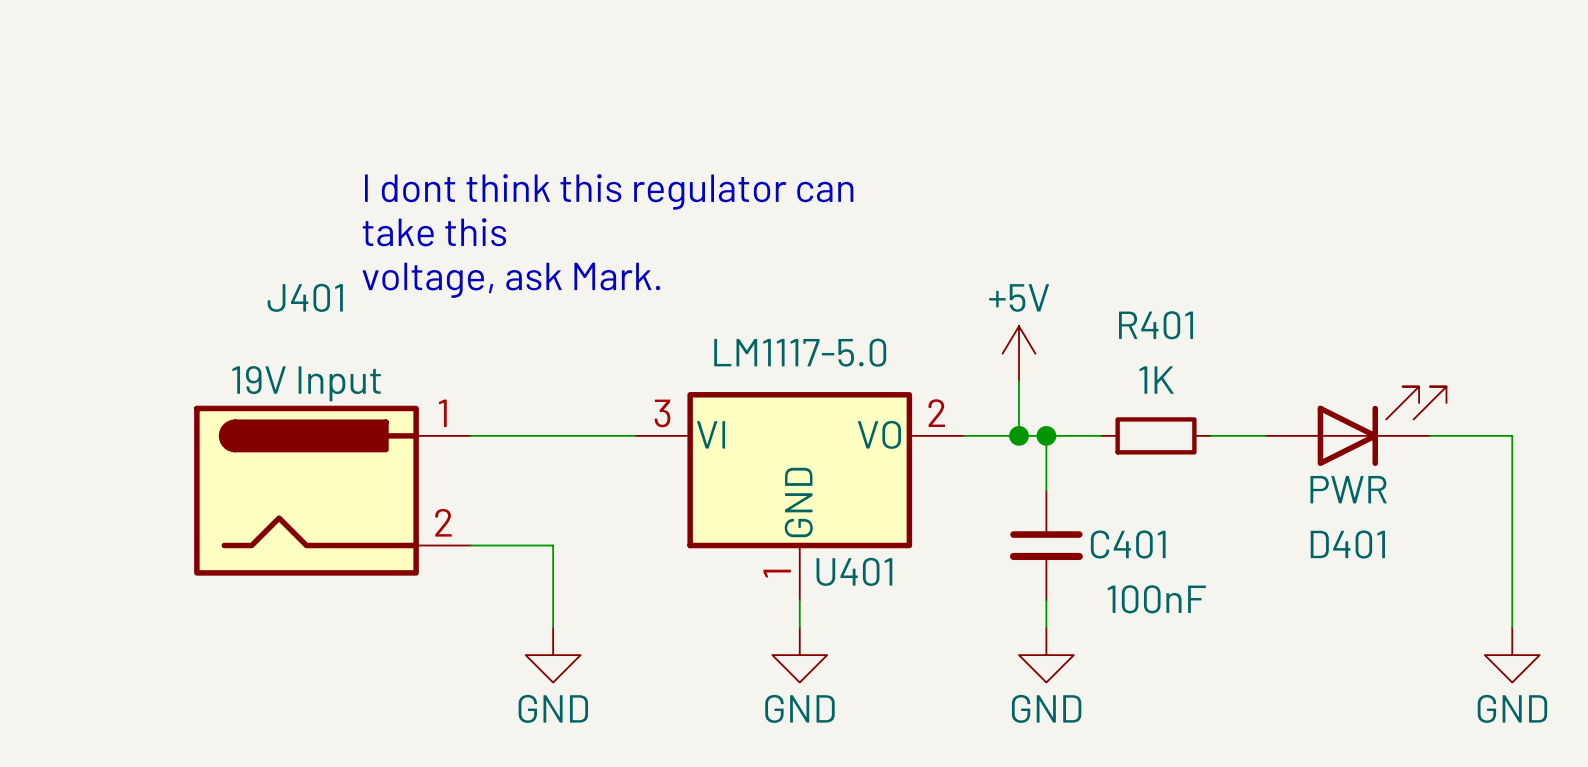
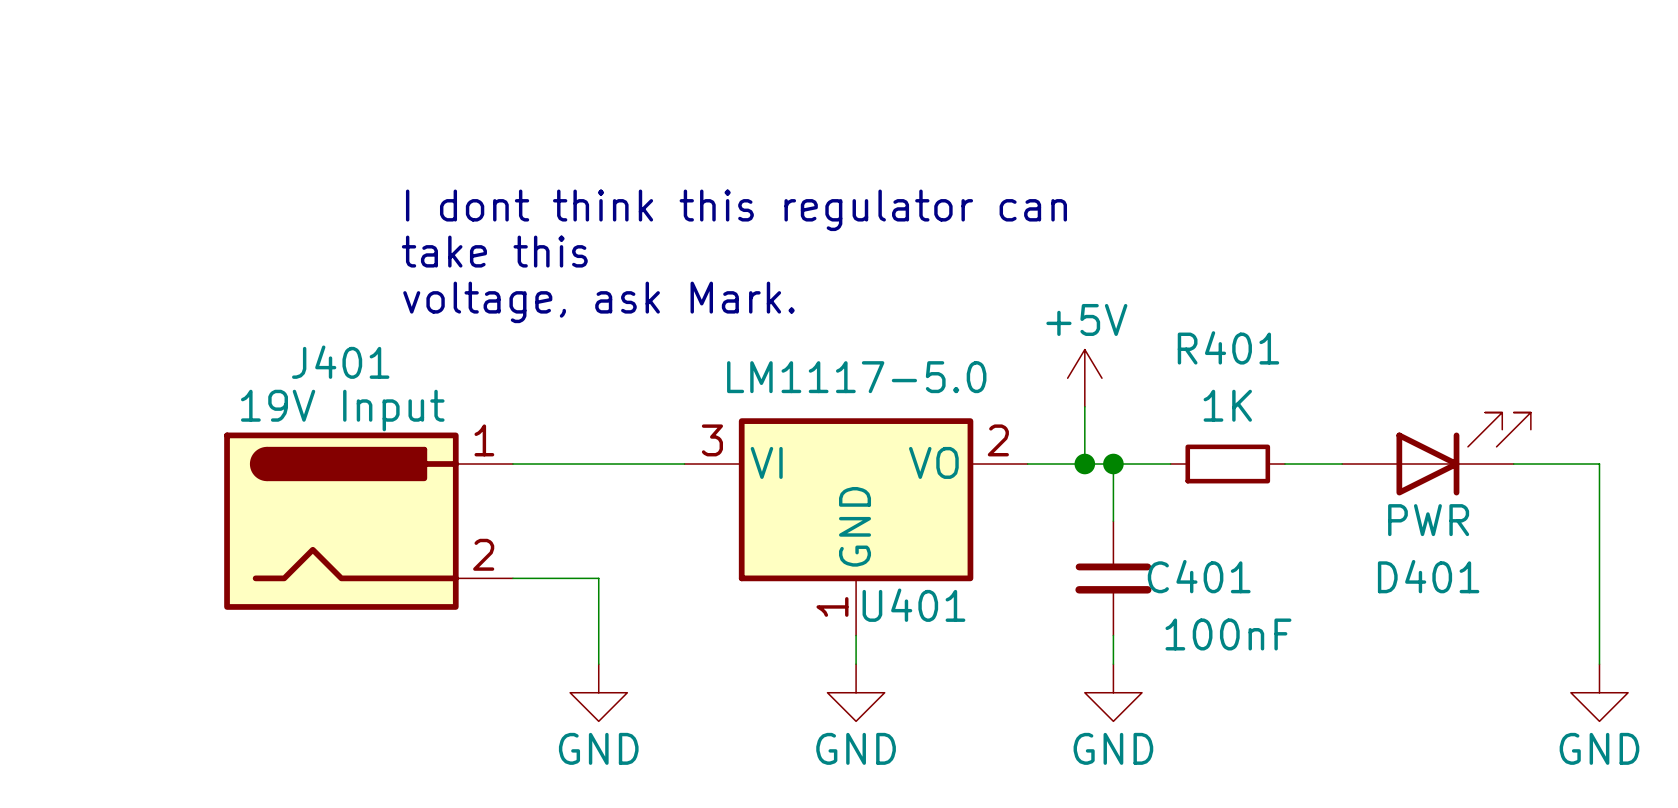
J401 name position: J401 (305, 297) -> J401 (340, 362)

